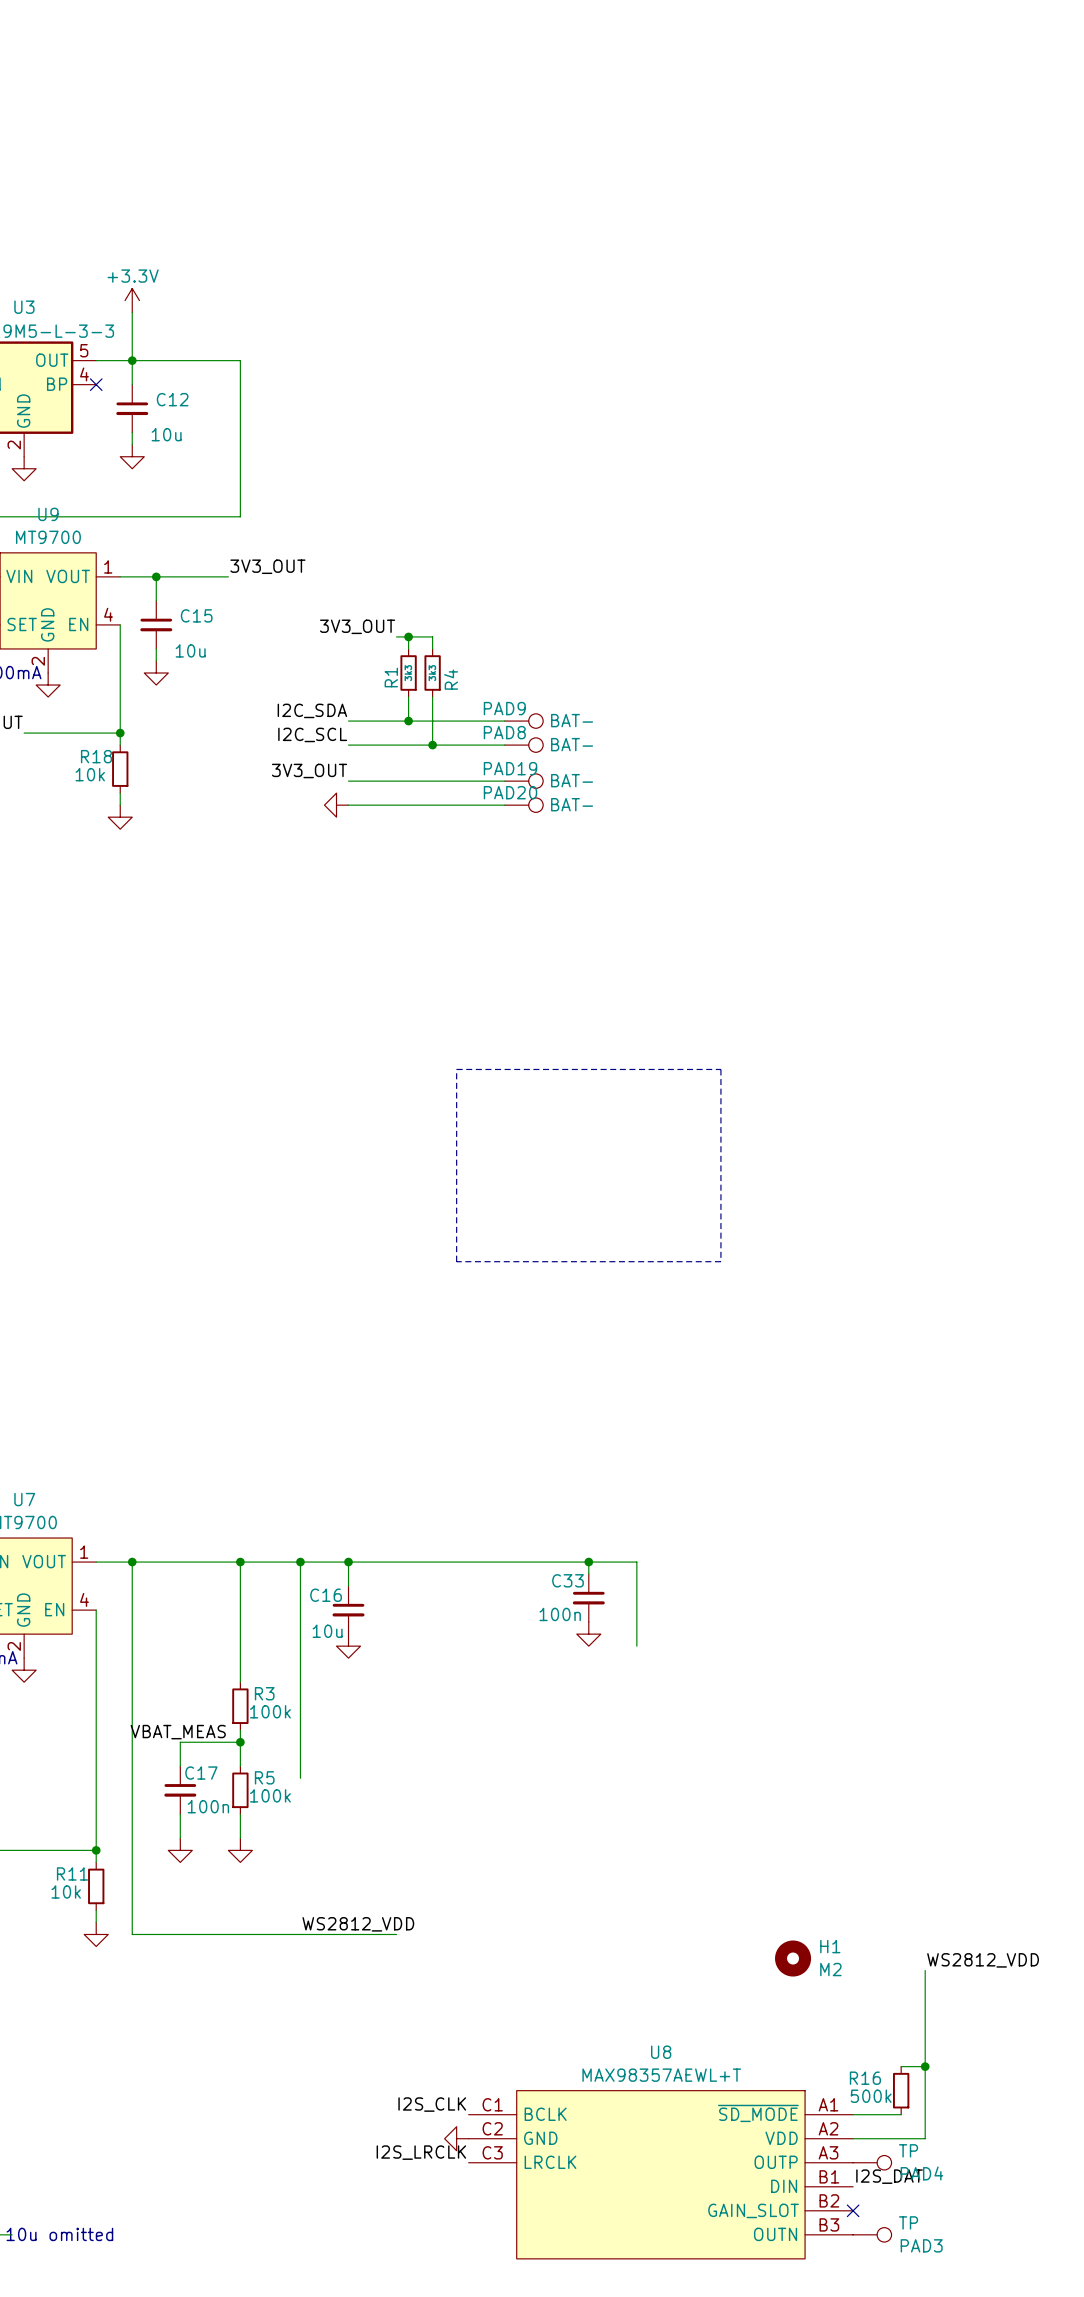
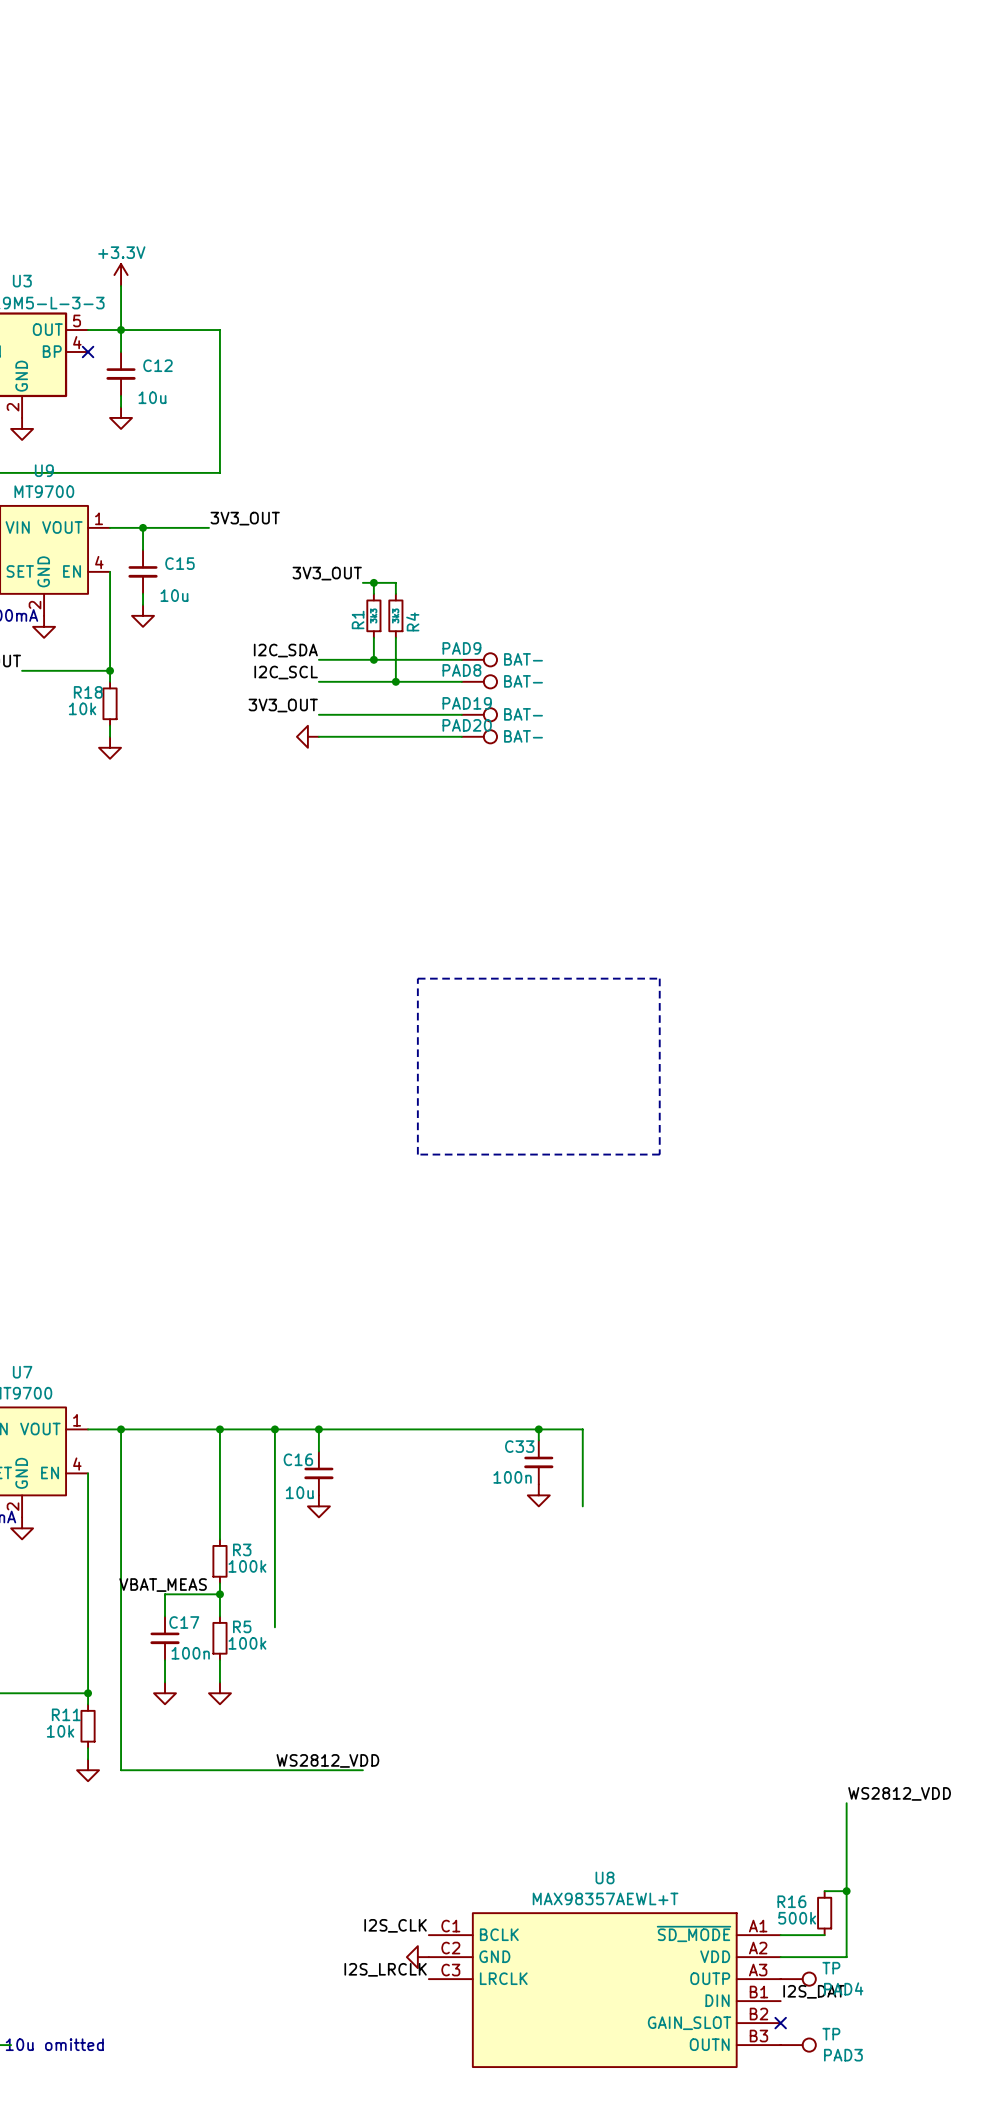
H1: M2 (793, 1958) -> none

